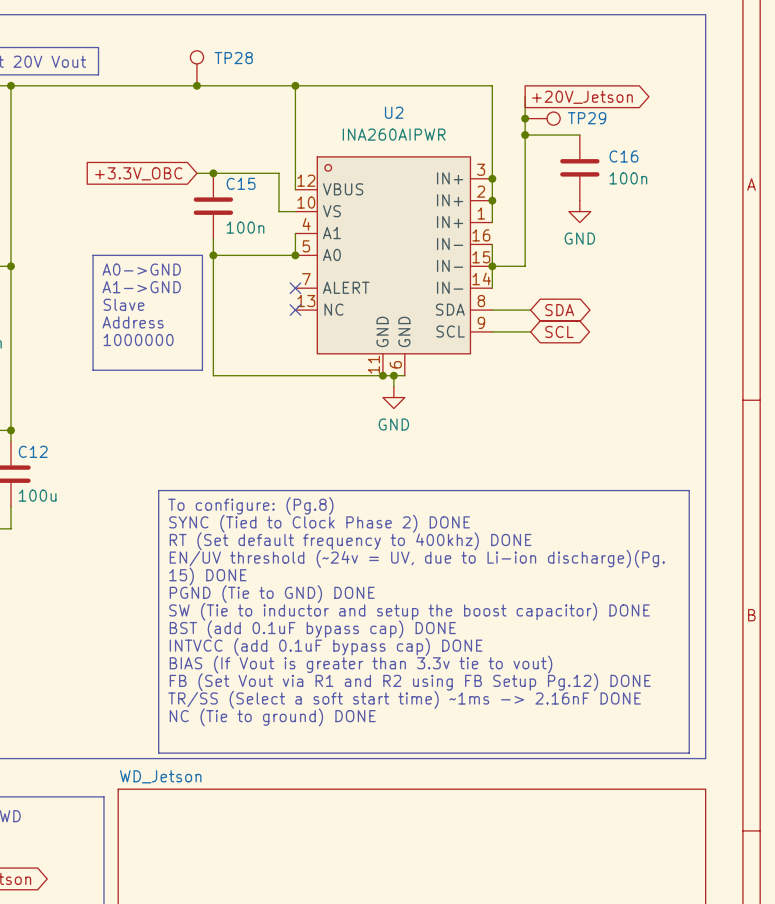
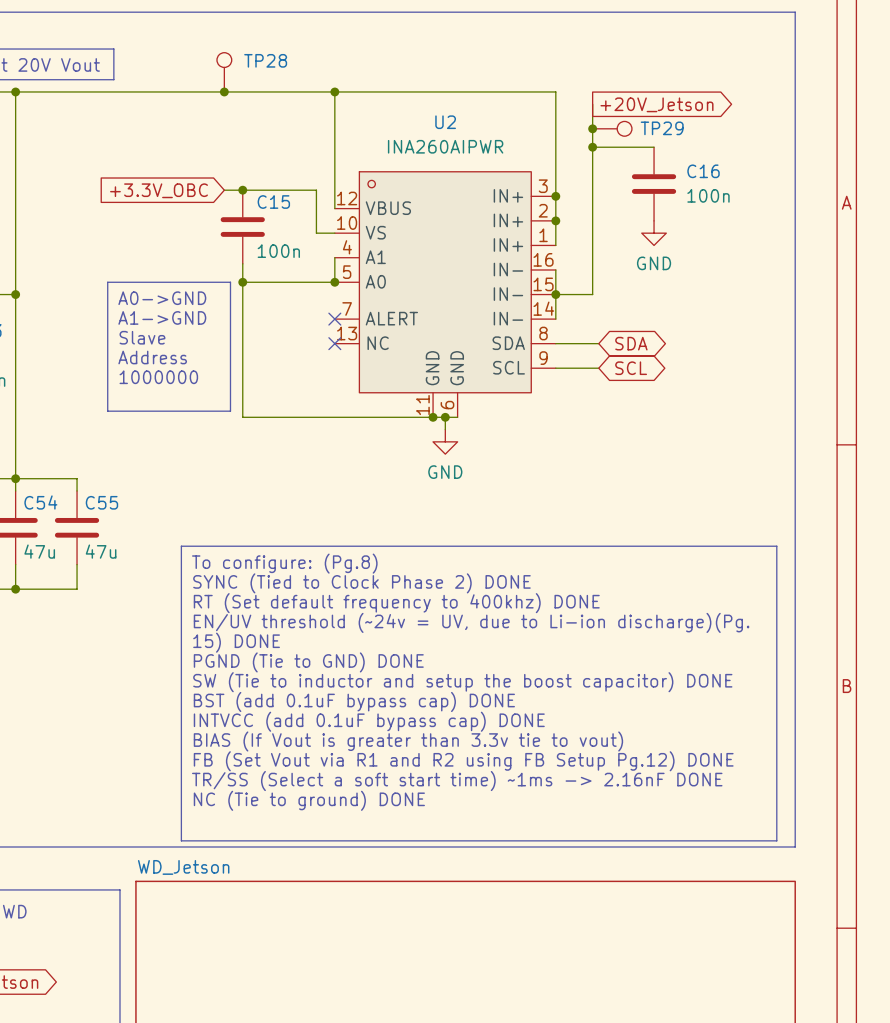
wire: none -> (15, 478) (77, 478) (77, 490)
C12 name: C12 (33, 451) -> C54 (40, 502)
C55: none -> 47u (77, 527)
C12 value: 100u (37, 495) -> 47u (39, 551)
wire: none -> (77, 564) (77, 589) (15, 589)
junction: none -> (15, 589)

